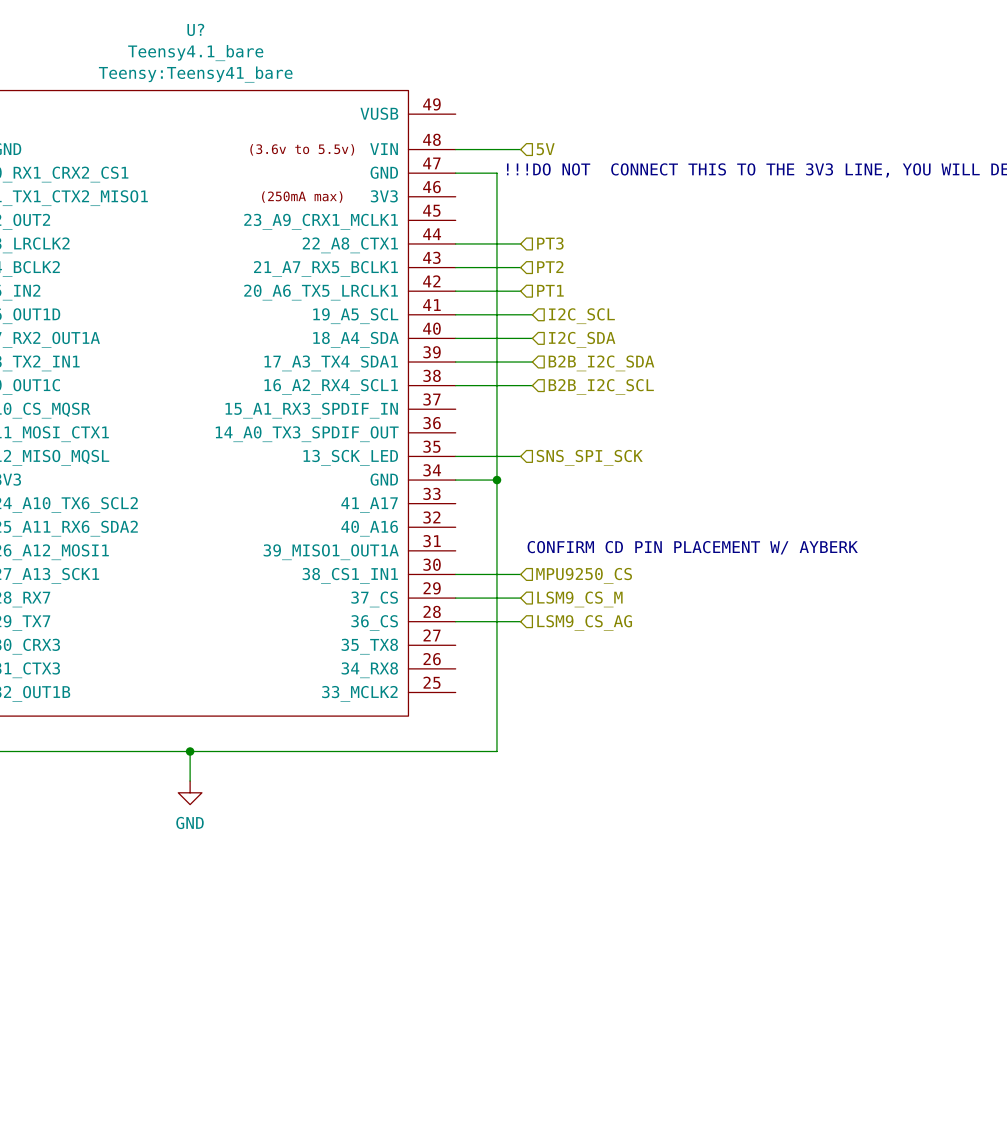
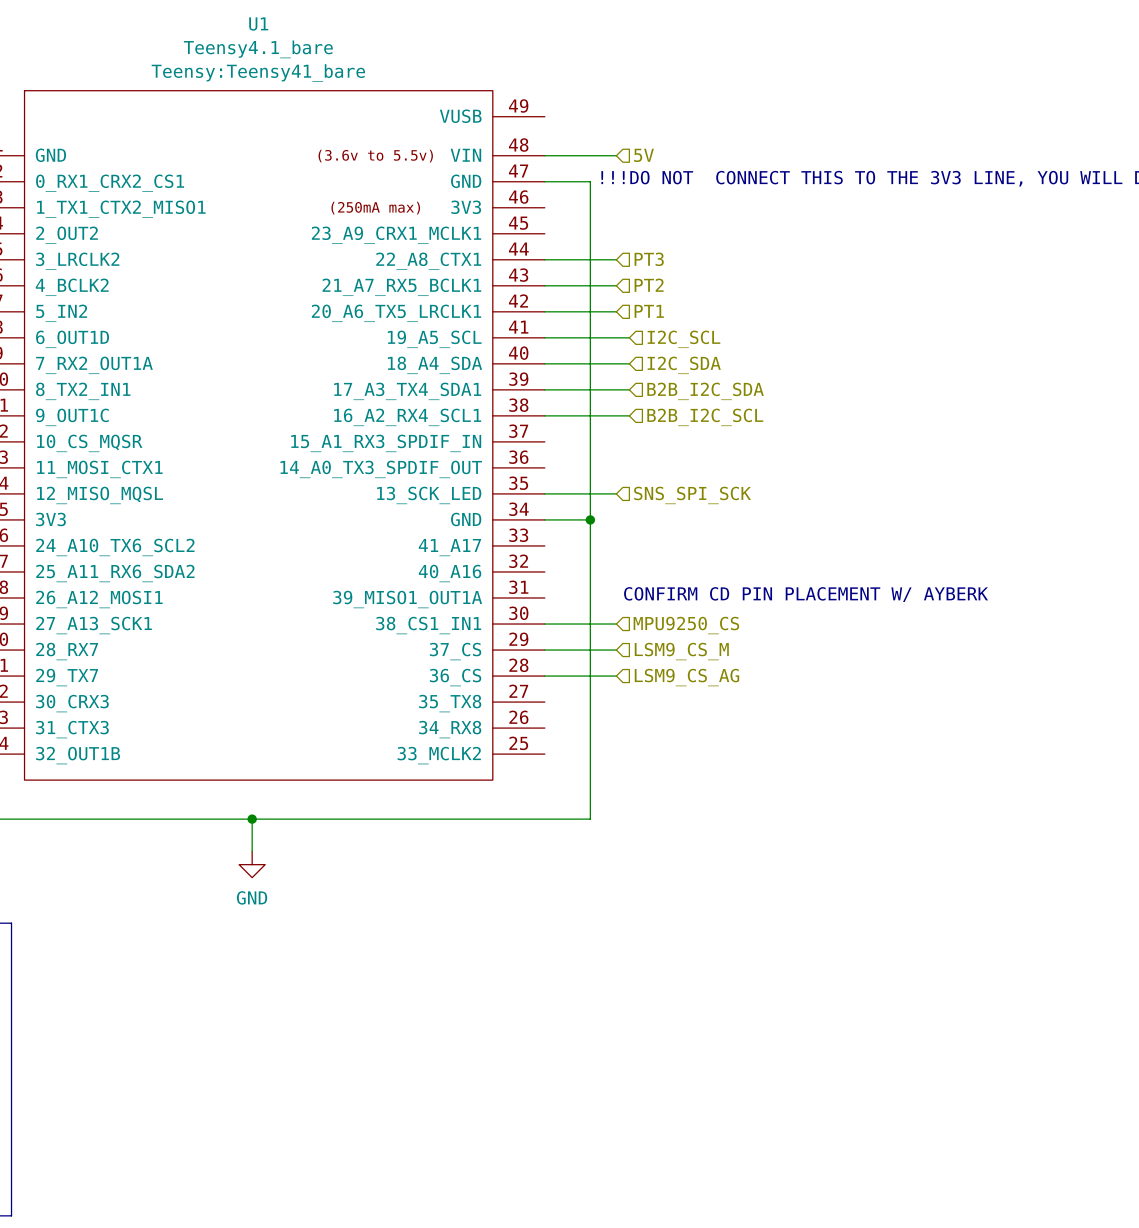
U? name: U? (195, 29) -> U1 (258, 24)

